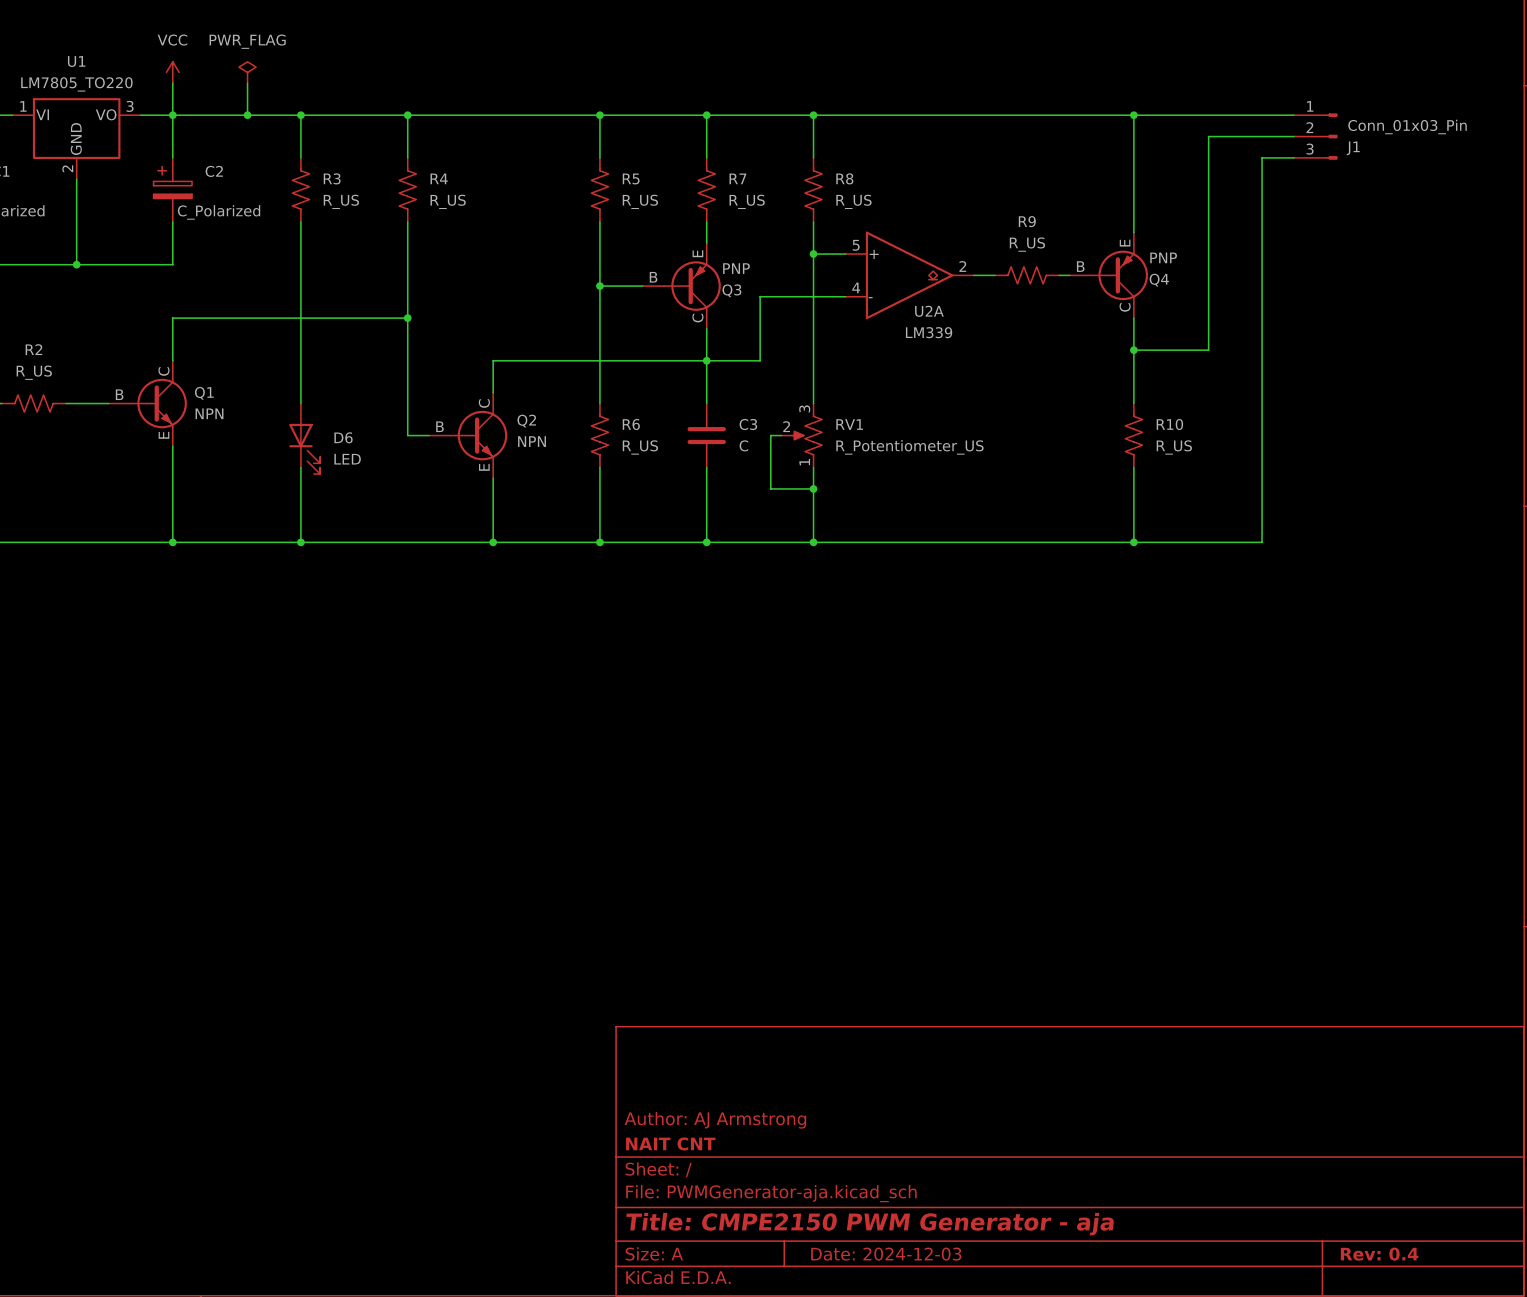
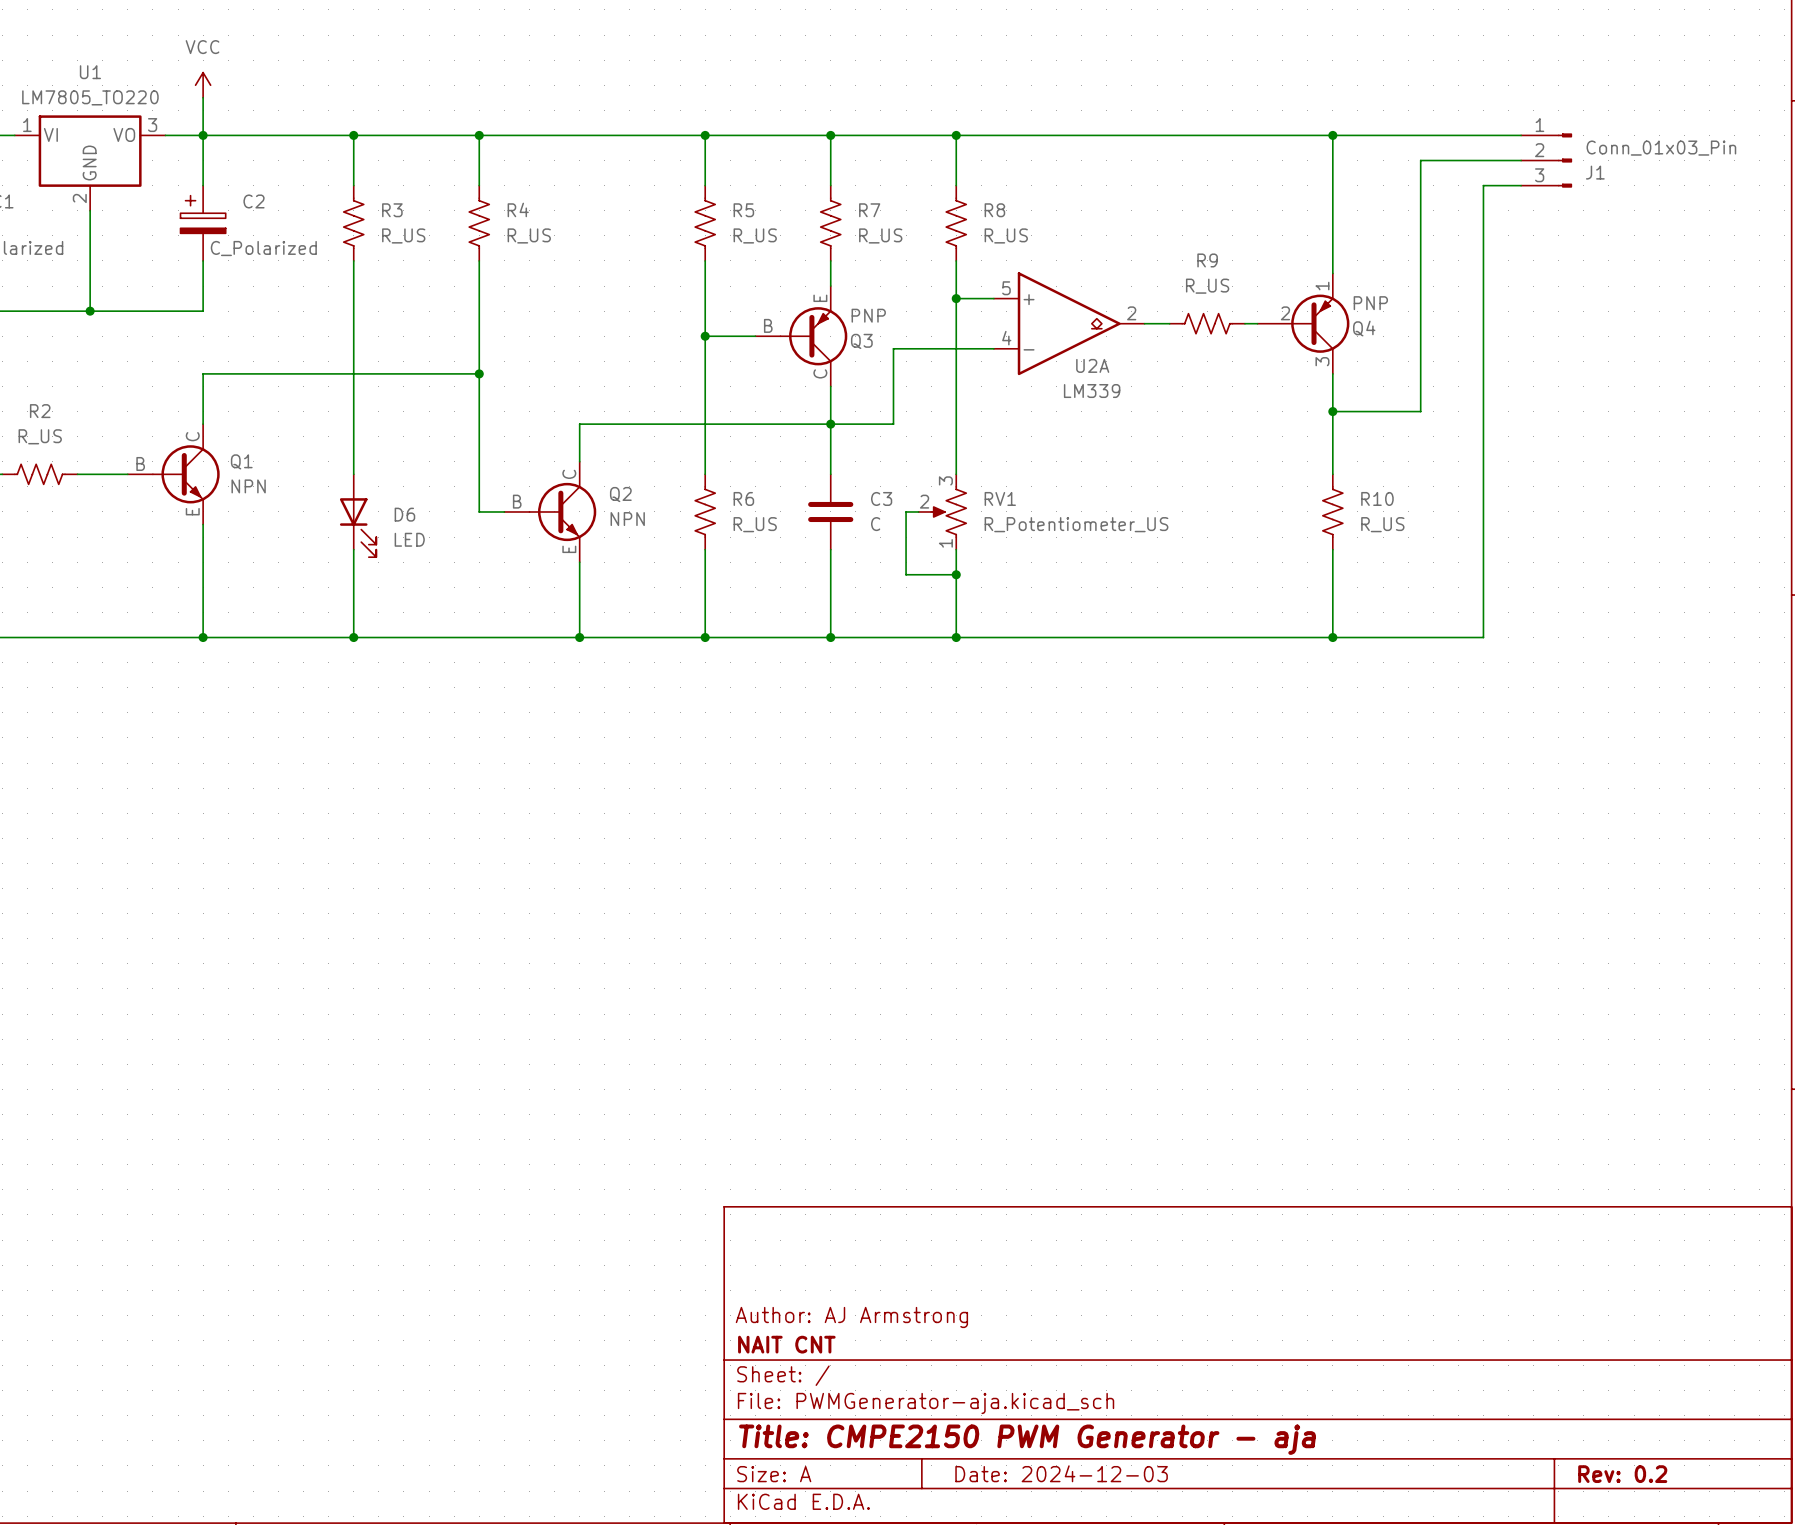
power symbol: PWR_FLAG (247, 72) -> none
wire: (247, 83) (247, 115) -> none
junction: (247, 115) -> none
Q4 symbol: [1069, 232, 1148, 319] -> [1257, 273, 1350, 374]
title block: Rev: 0.4 (1379, 1254) -> Rev: 0.2 (1622, 1474)

